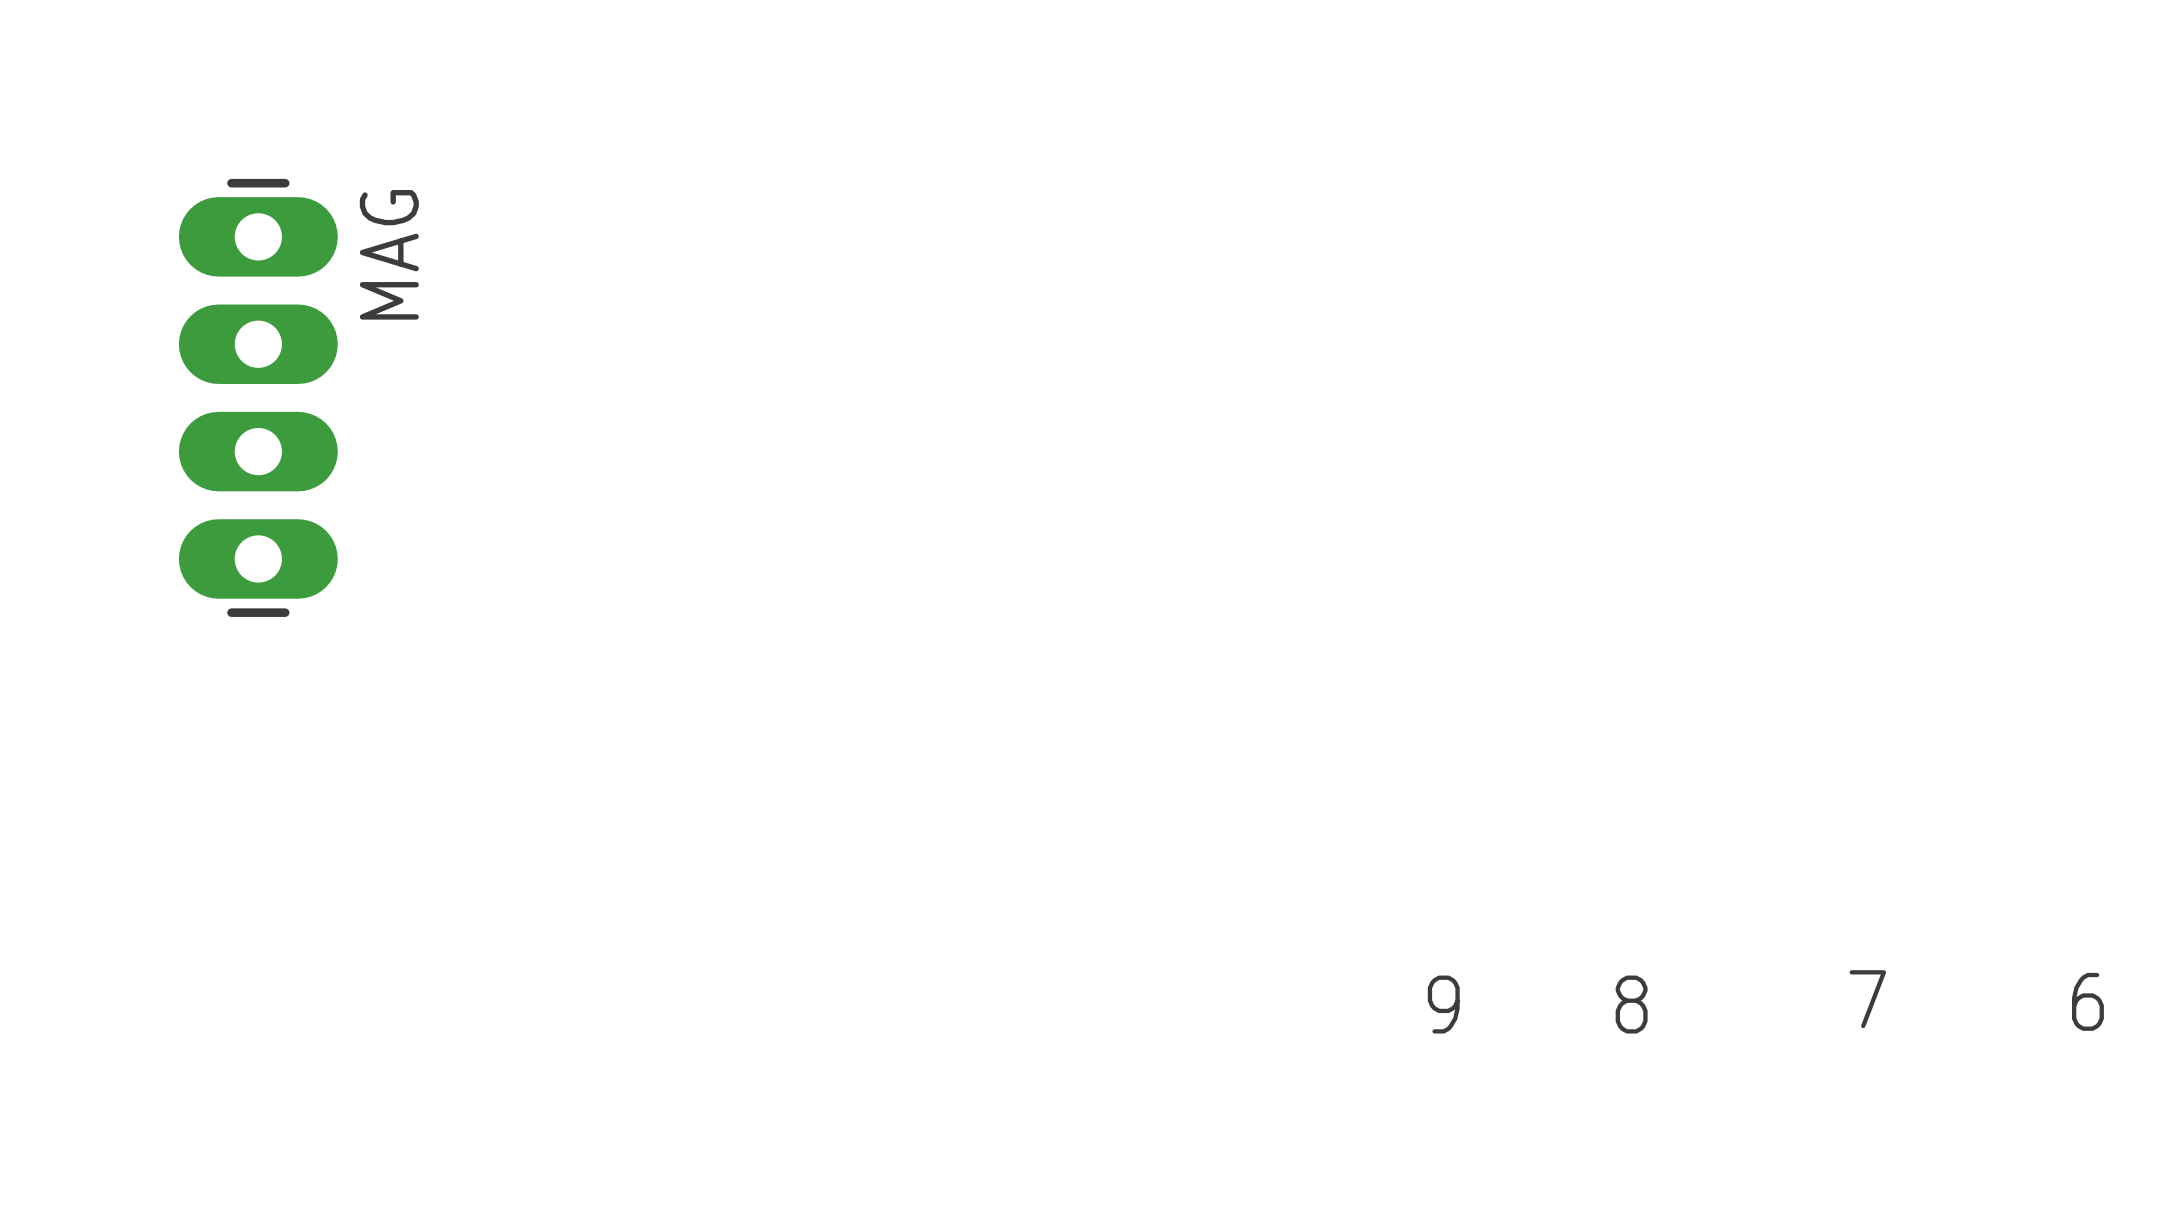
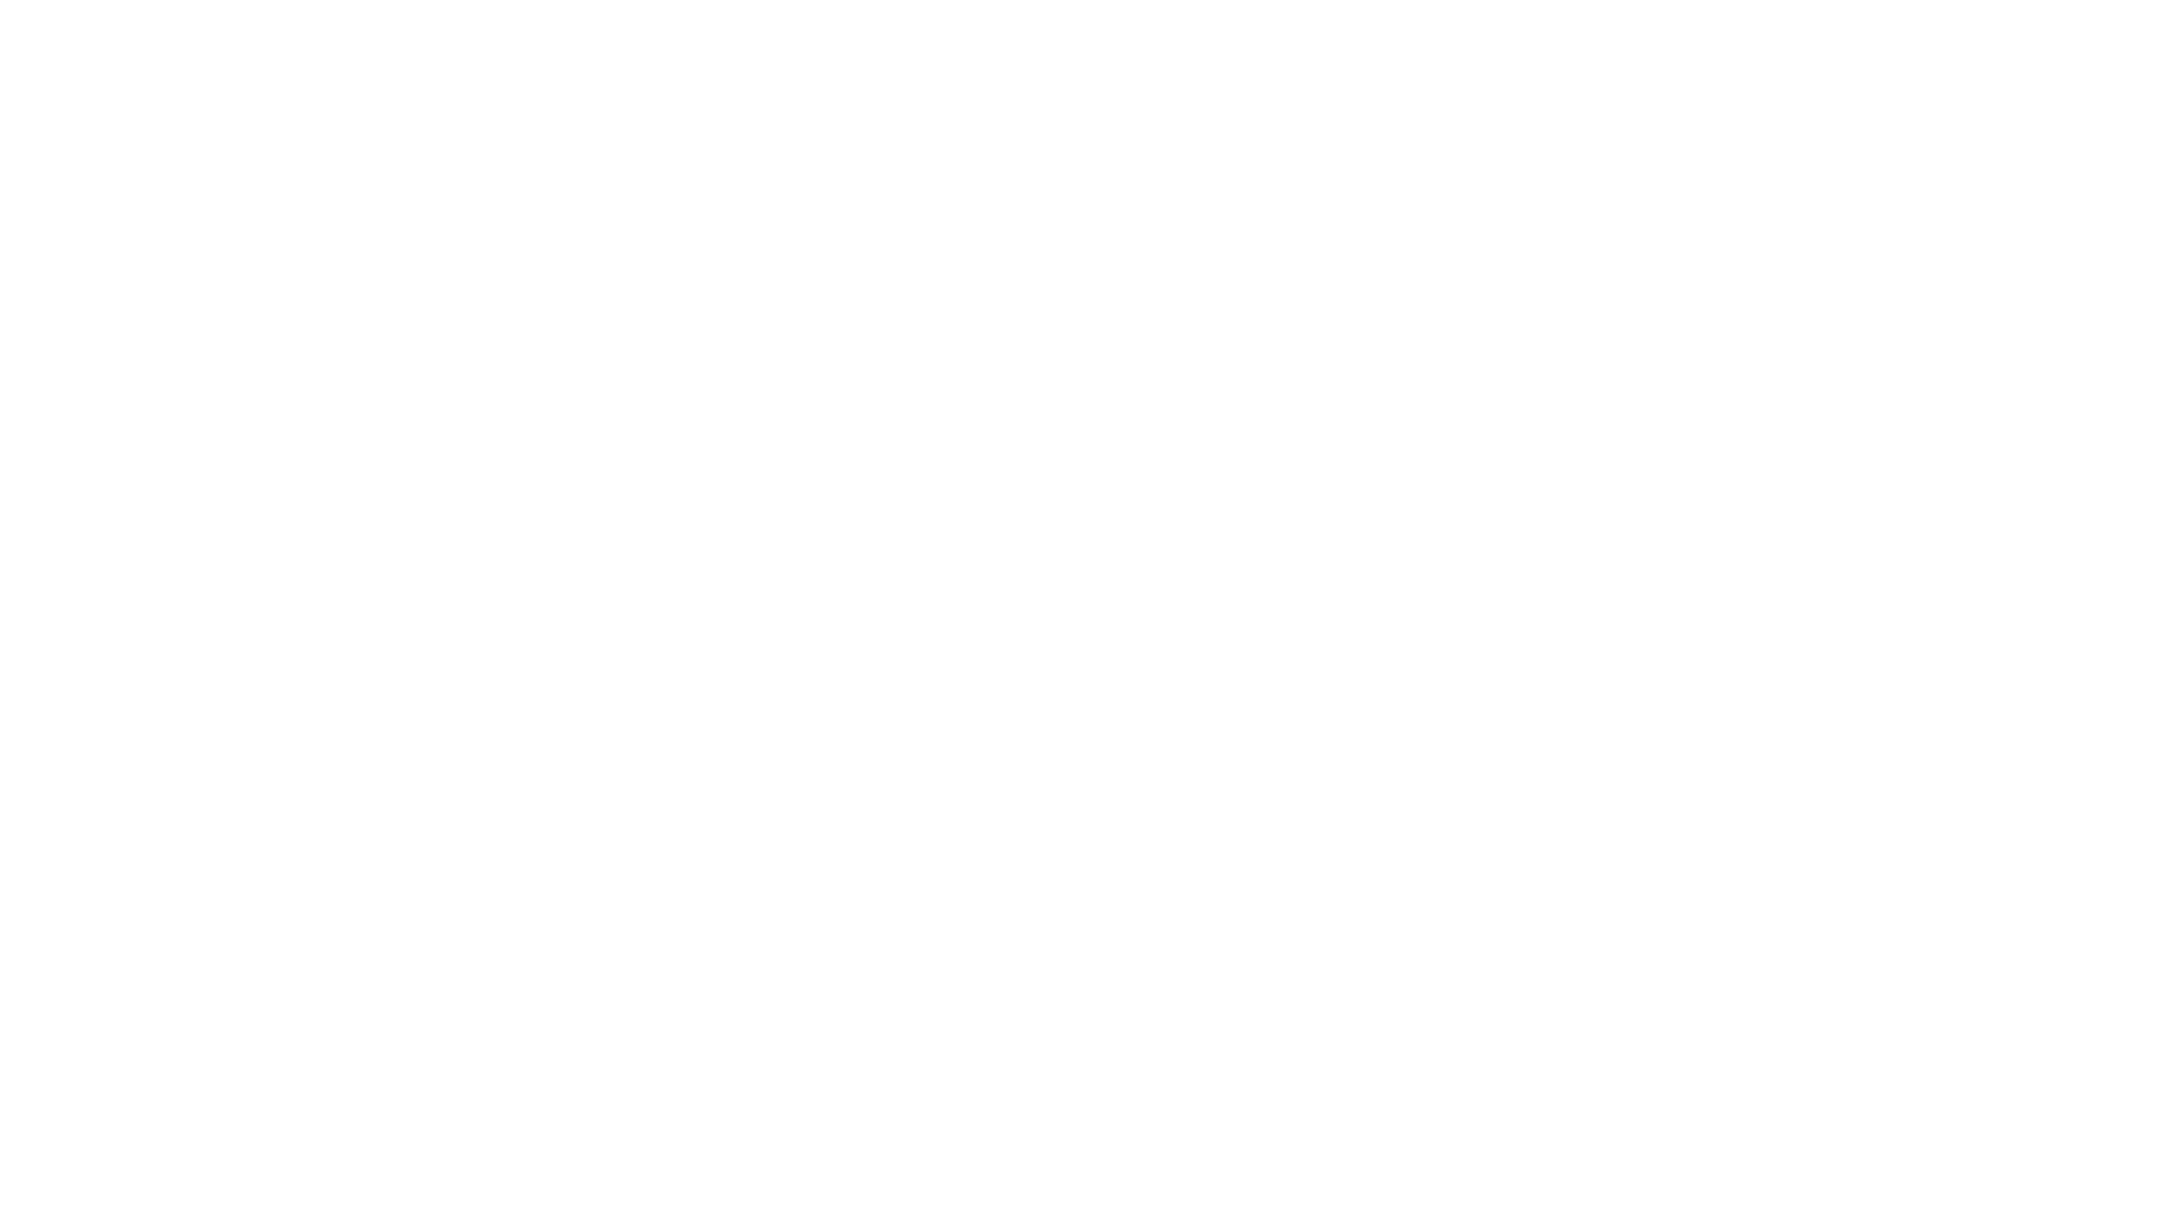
MAG: (258, 397) -> none
text: 7 (1867, 999) -> none
text: 6 (2087, 1001) -> none
text: 9 (1443, 1004) -> none
text: 8 (1631, 1004) -> none

